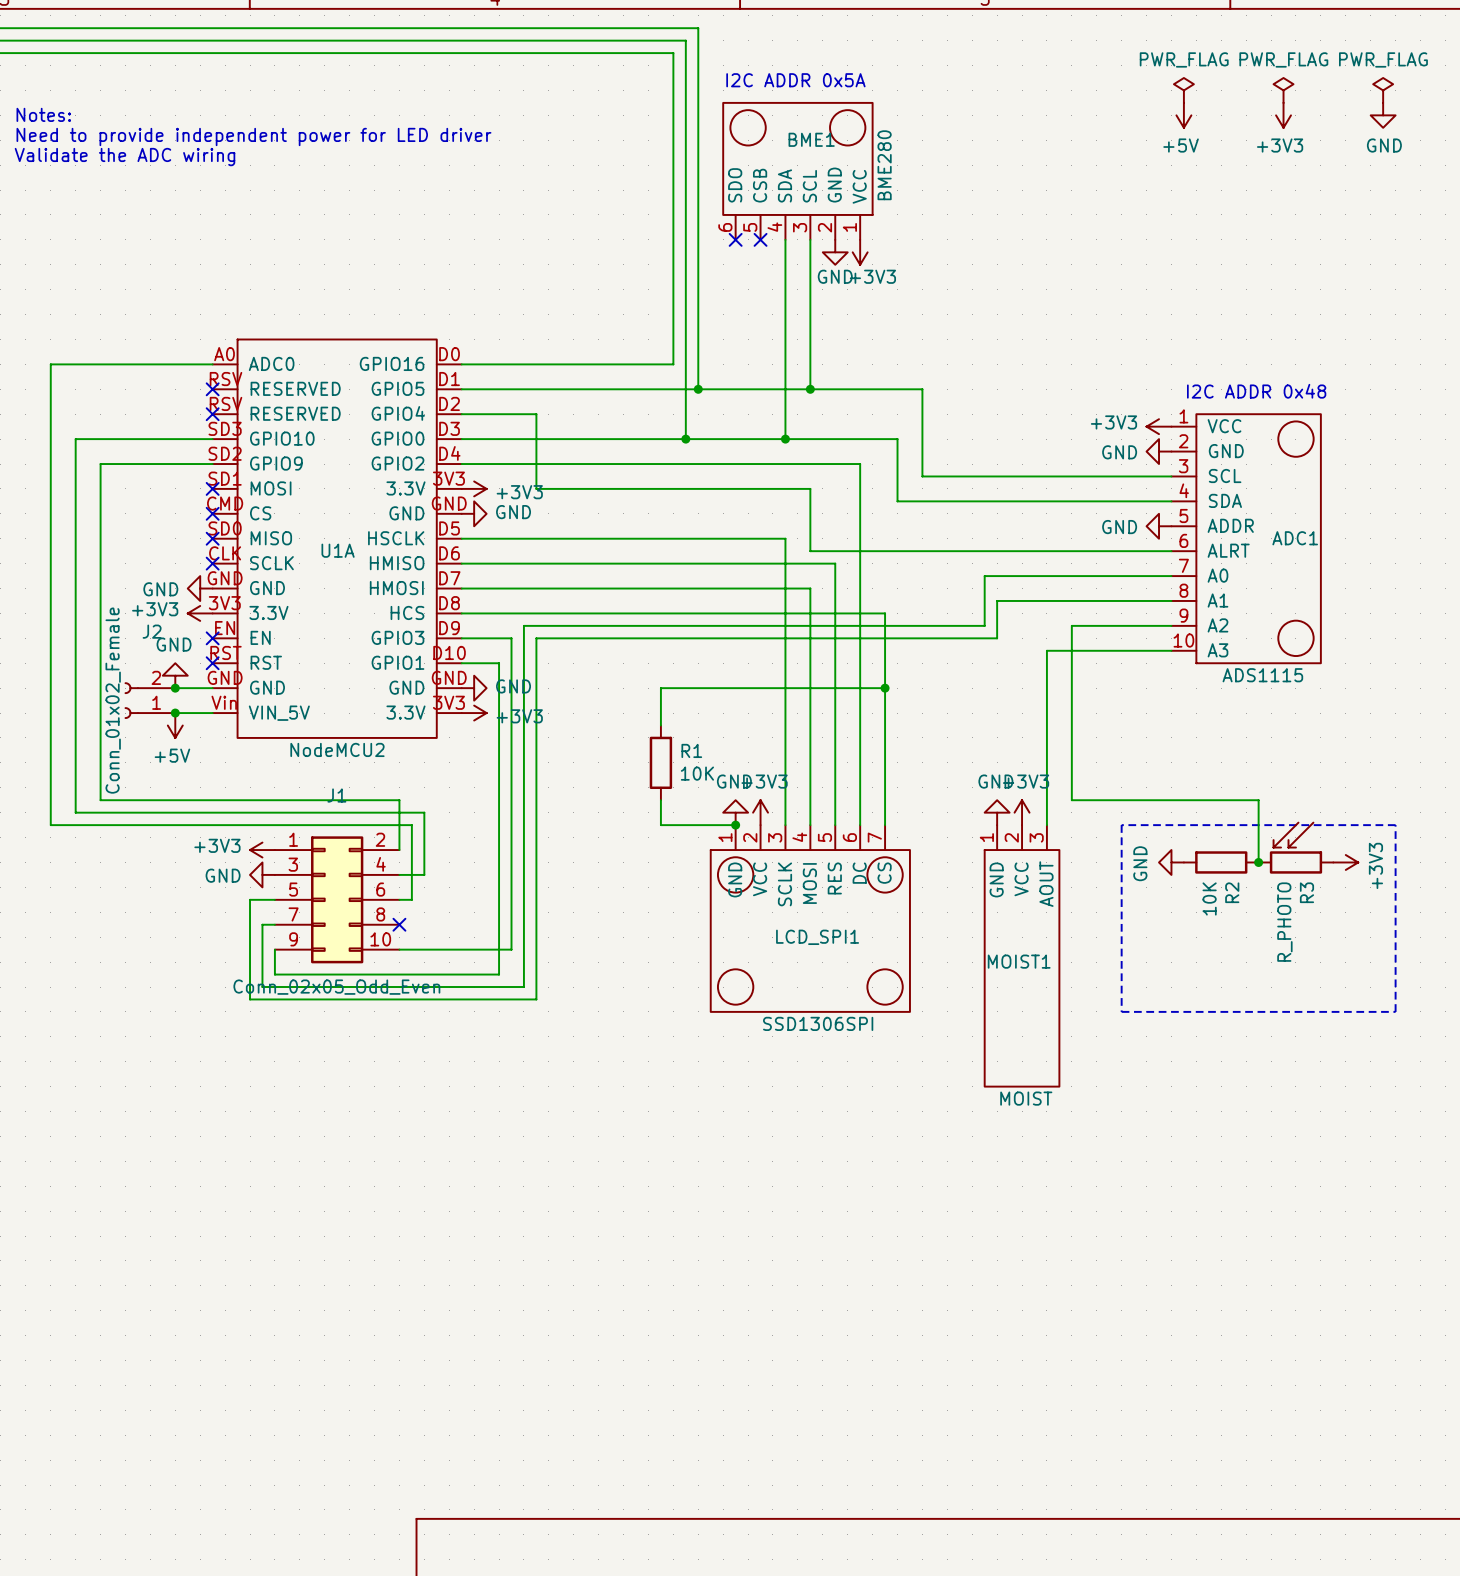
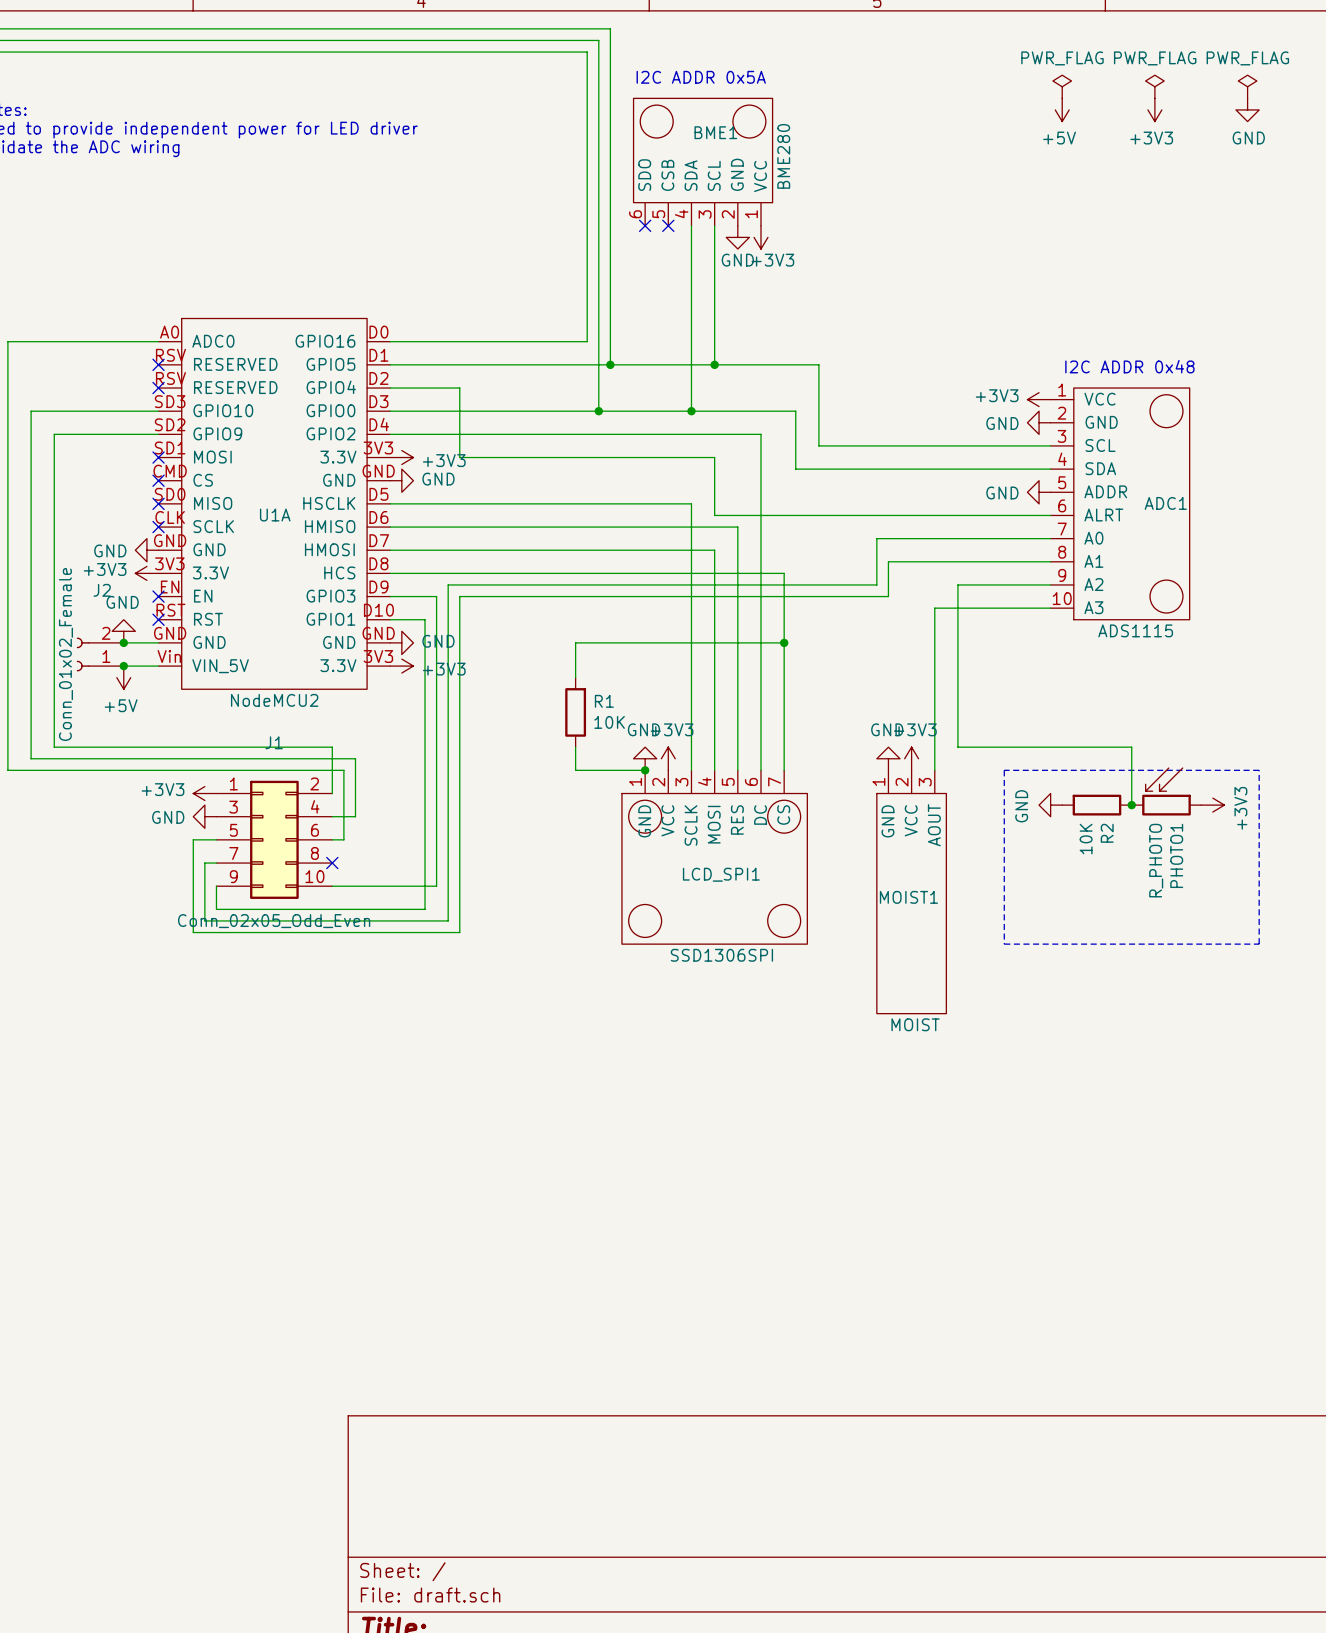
R3 name: R3 (1306, 892) -> PHOTO1 (1176, 855)

